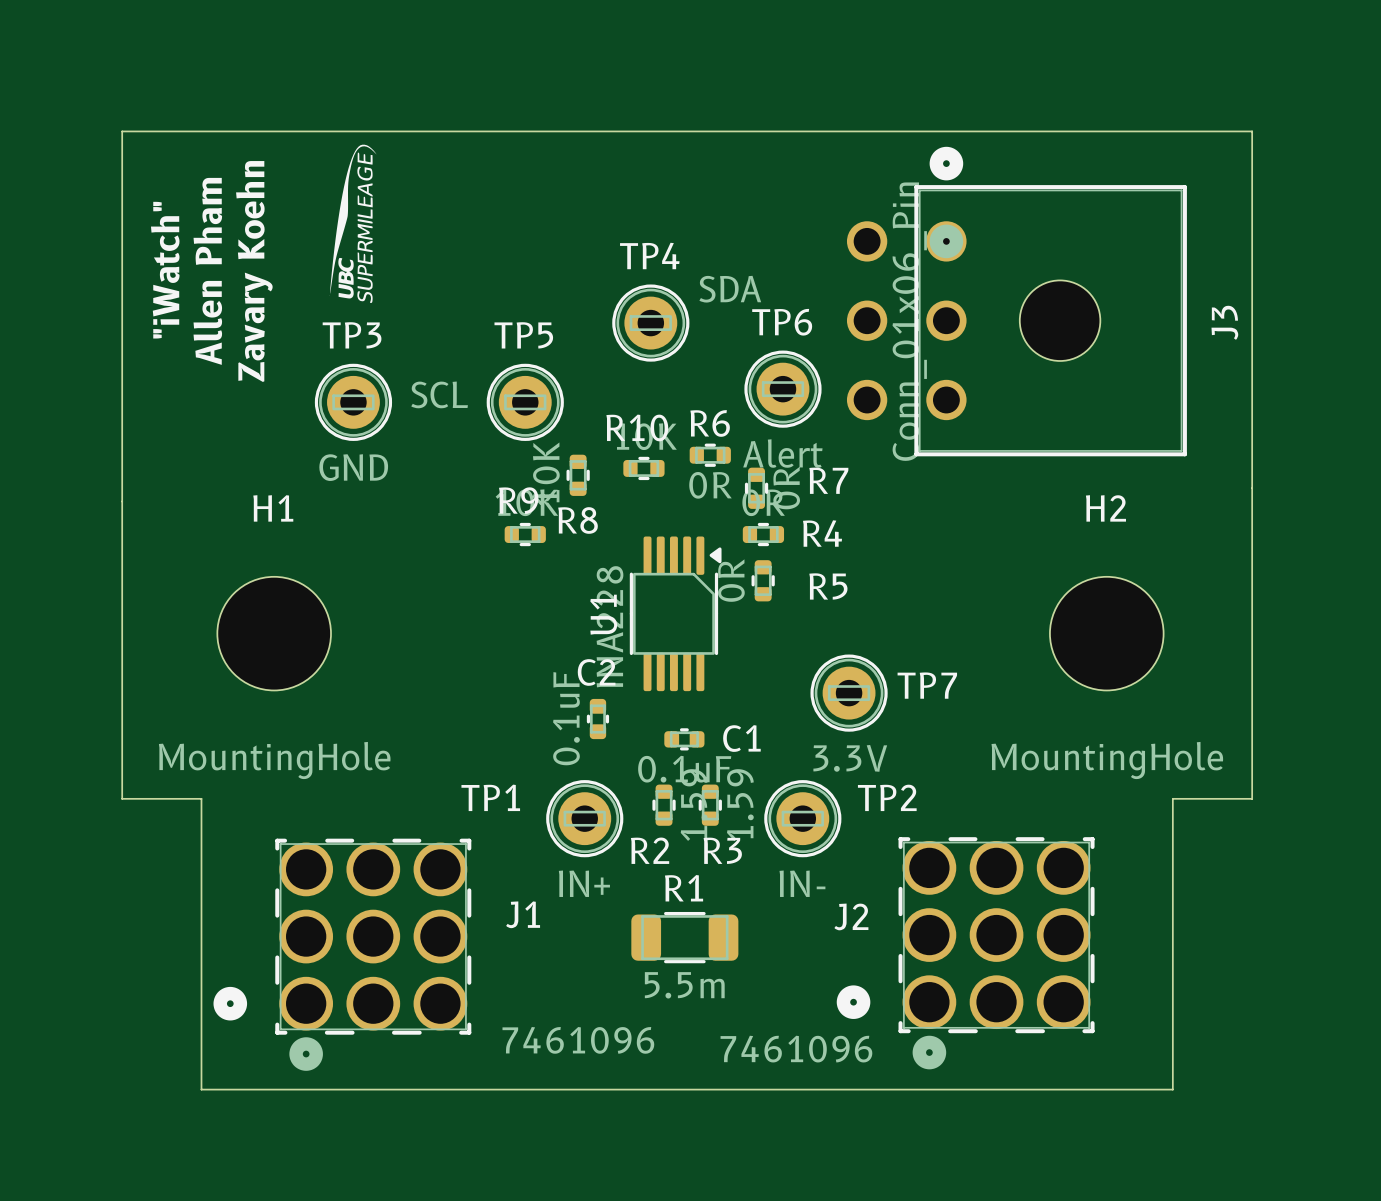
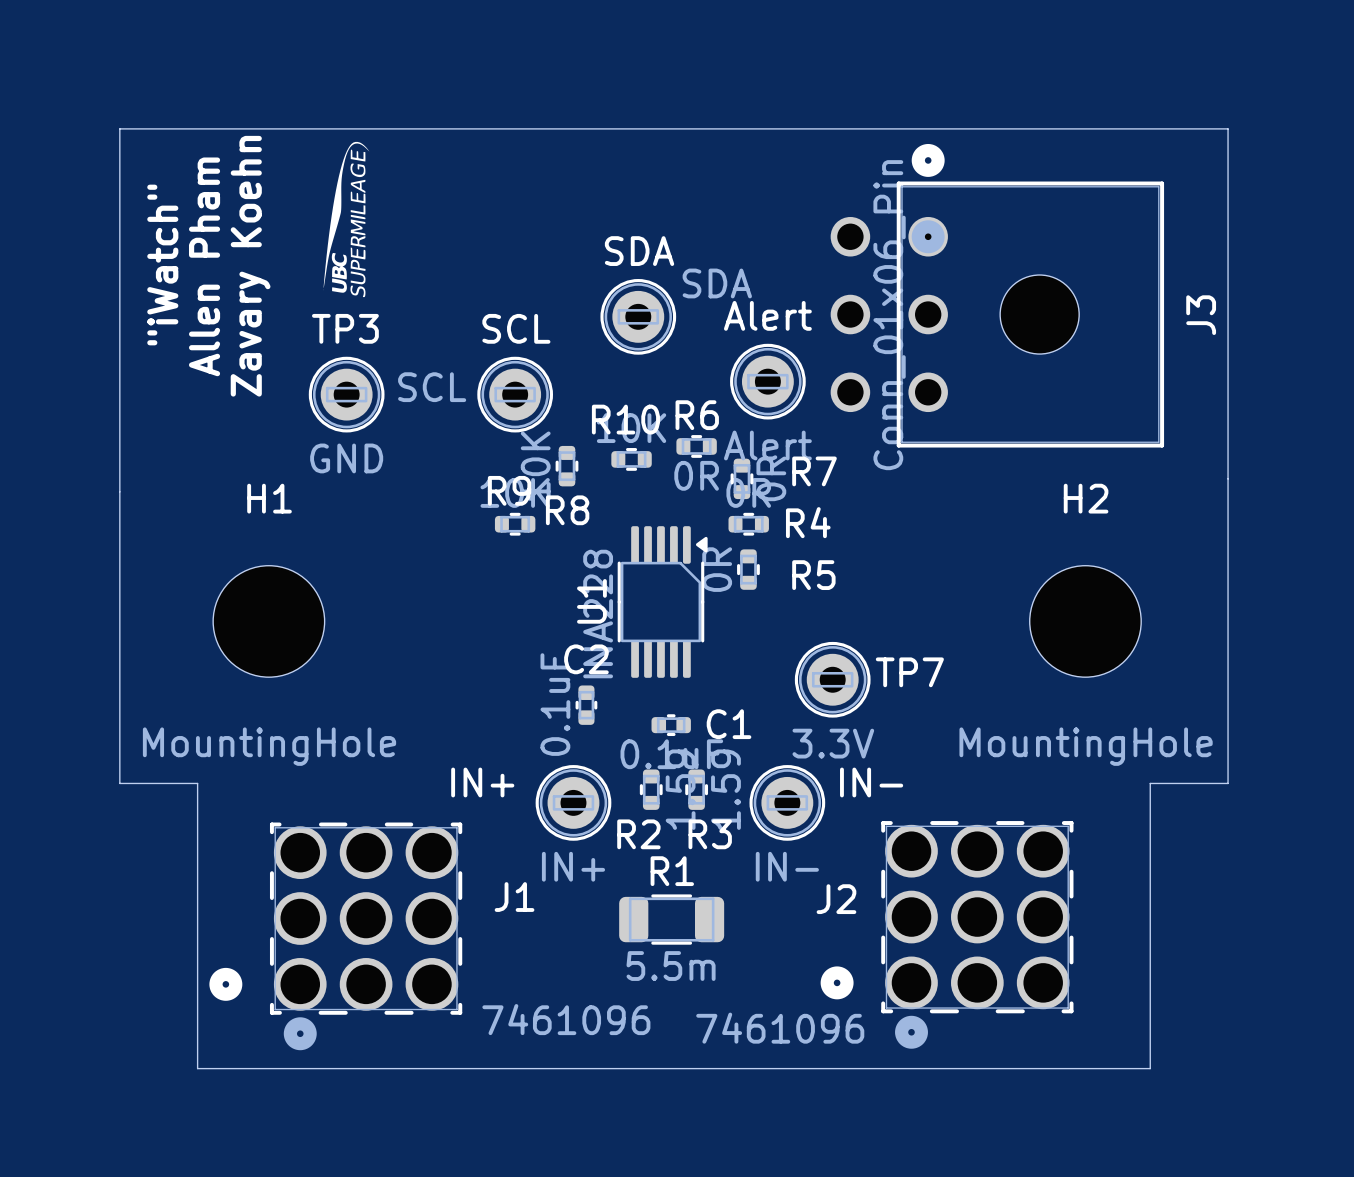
TP4 name: TP4 (649, 256) -> SDA (639, 251)
TP6 name: TP6 (782, 322) -> Alert (767, 315)
TP5 name: TP5 (523, 335) -> SCL (516, 328)
TP1 name: TP1 (490, 797) -> IN+ (482, 782)
TP2 name: TP2 (887, 797) -> IN- (871, 782)

